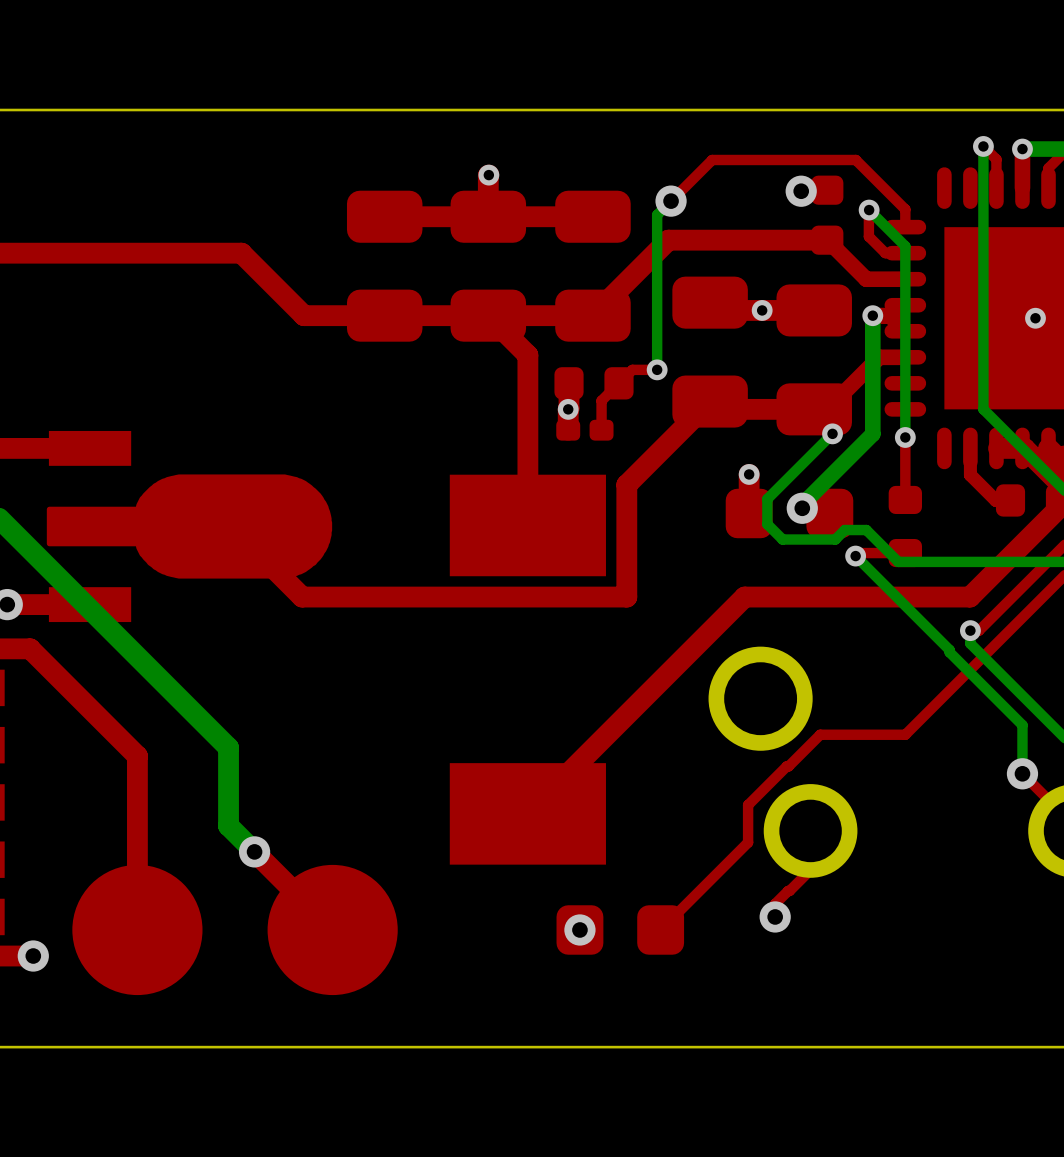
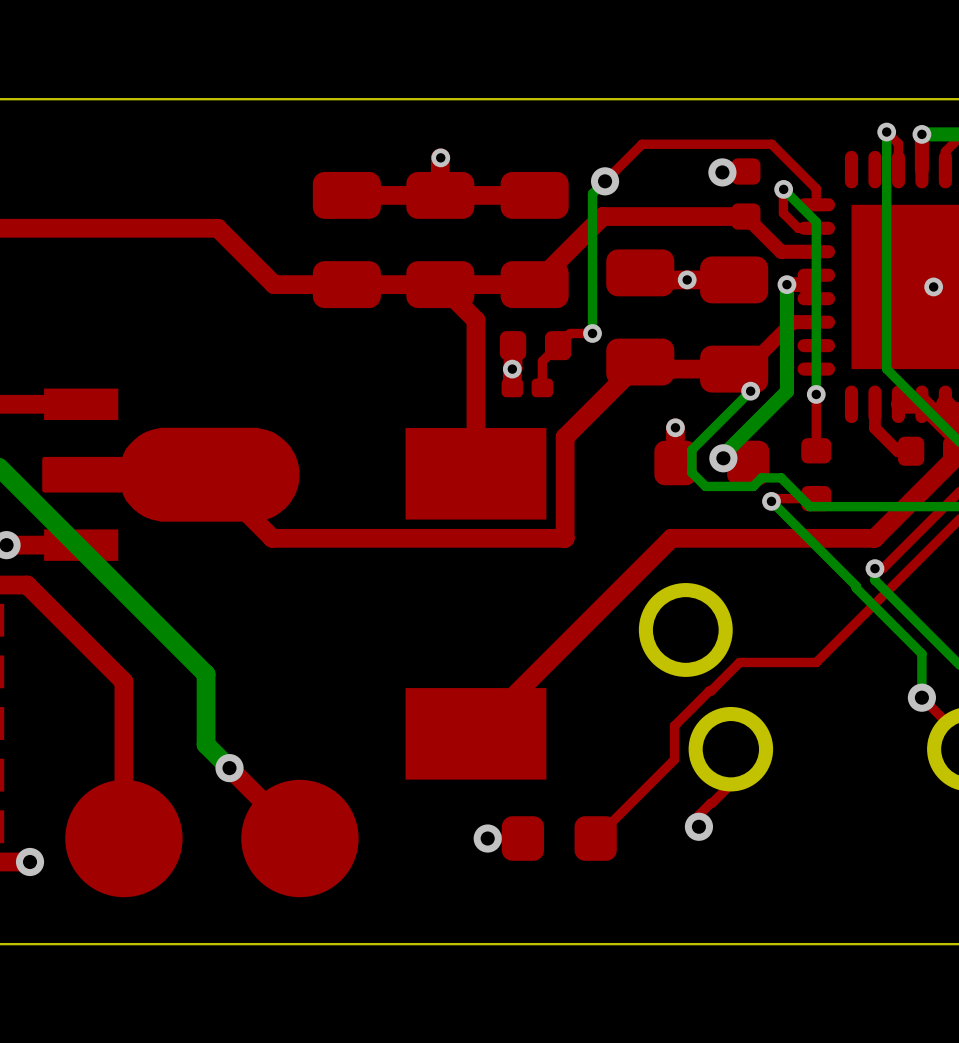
via position: (579, 929) -> (487, 838)

